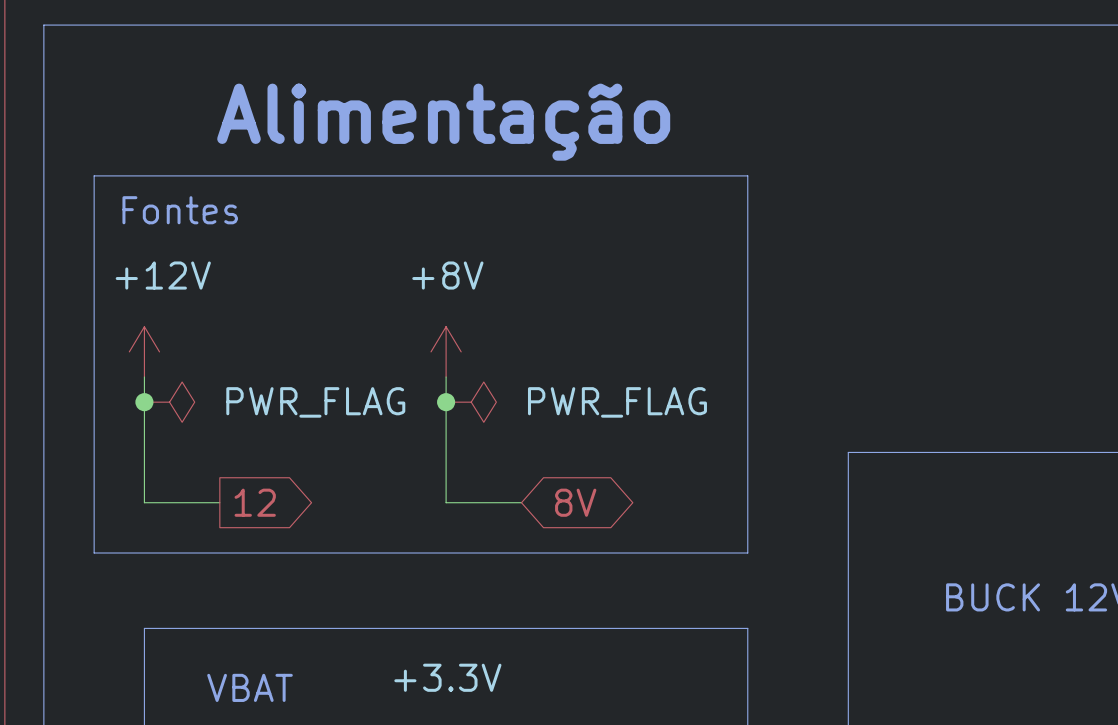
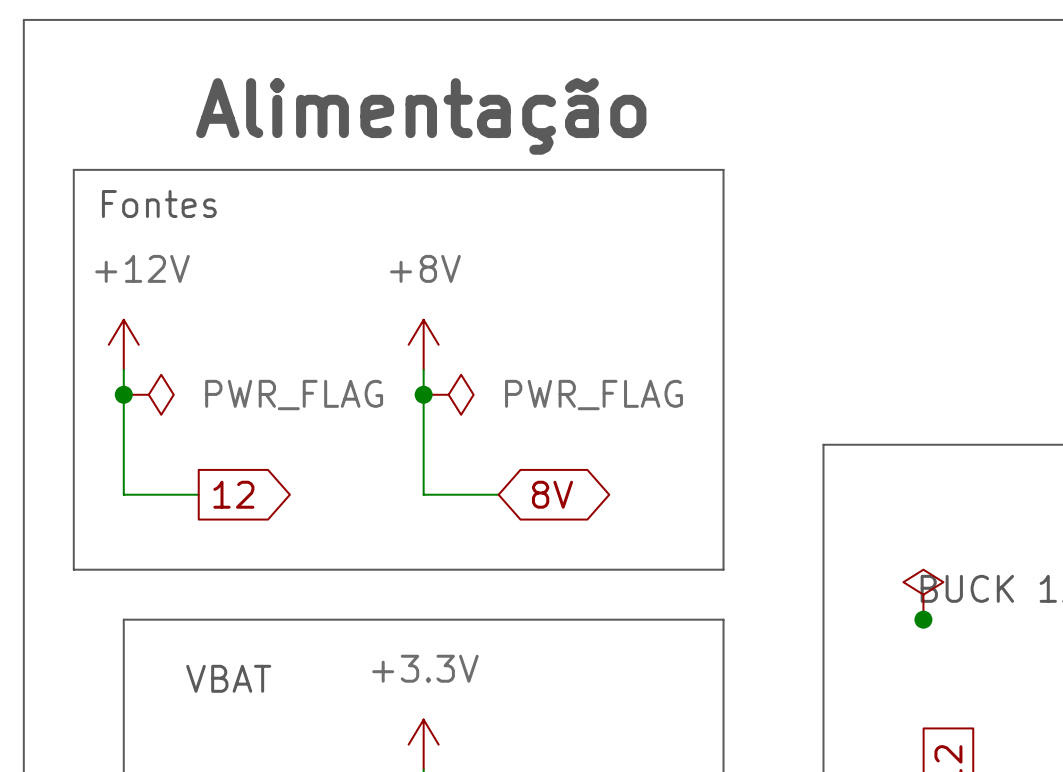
line: (94, 553) (747, 553) -> (73, 544) (73, 569) (723, 569) (723, 544)
power symbol: none -> (923, 594)
junction: none -> (923, 619)

